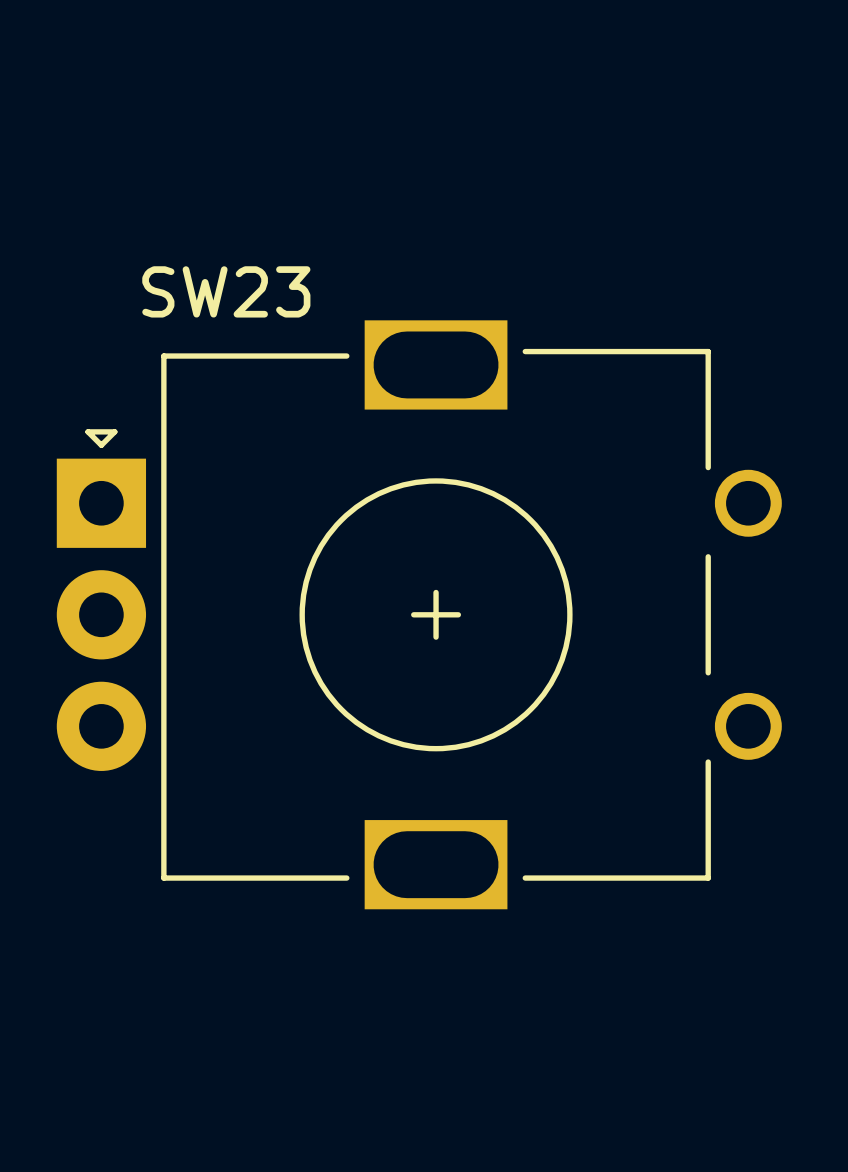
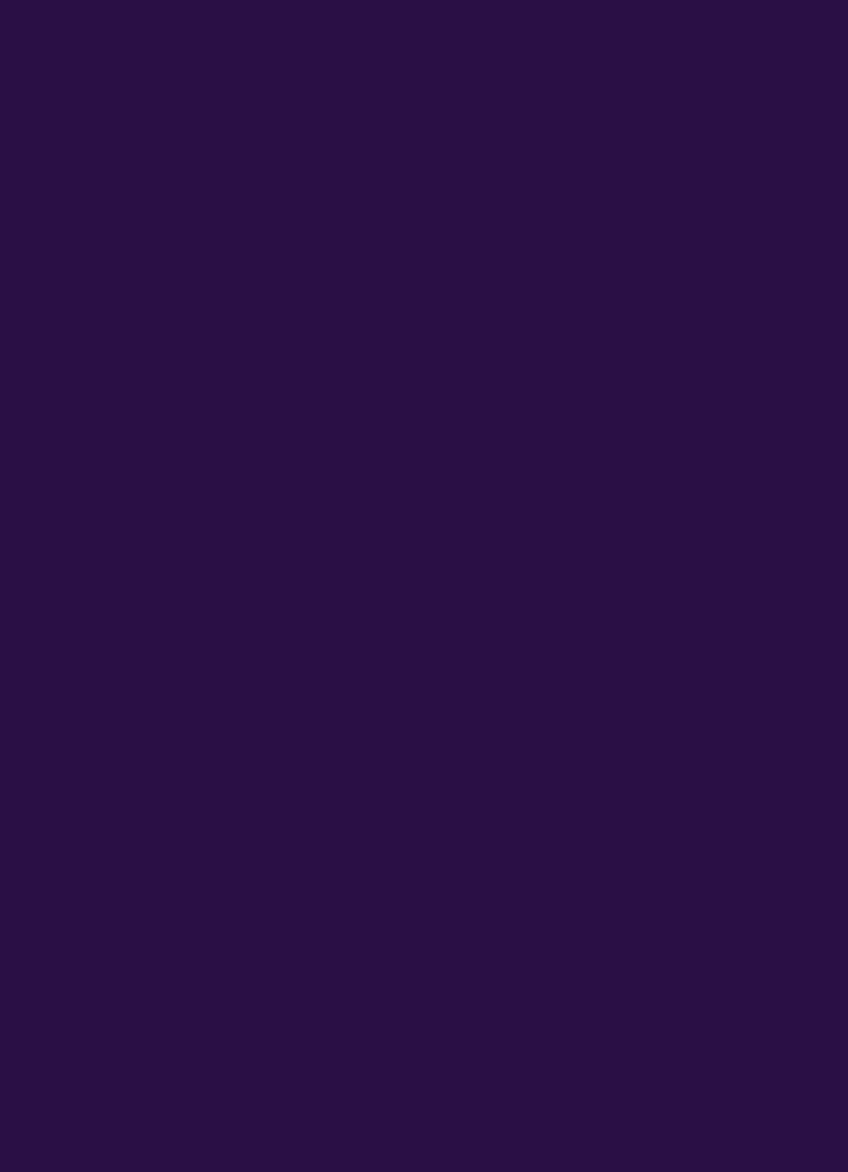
SW23: (419, 614) -> none

